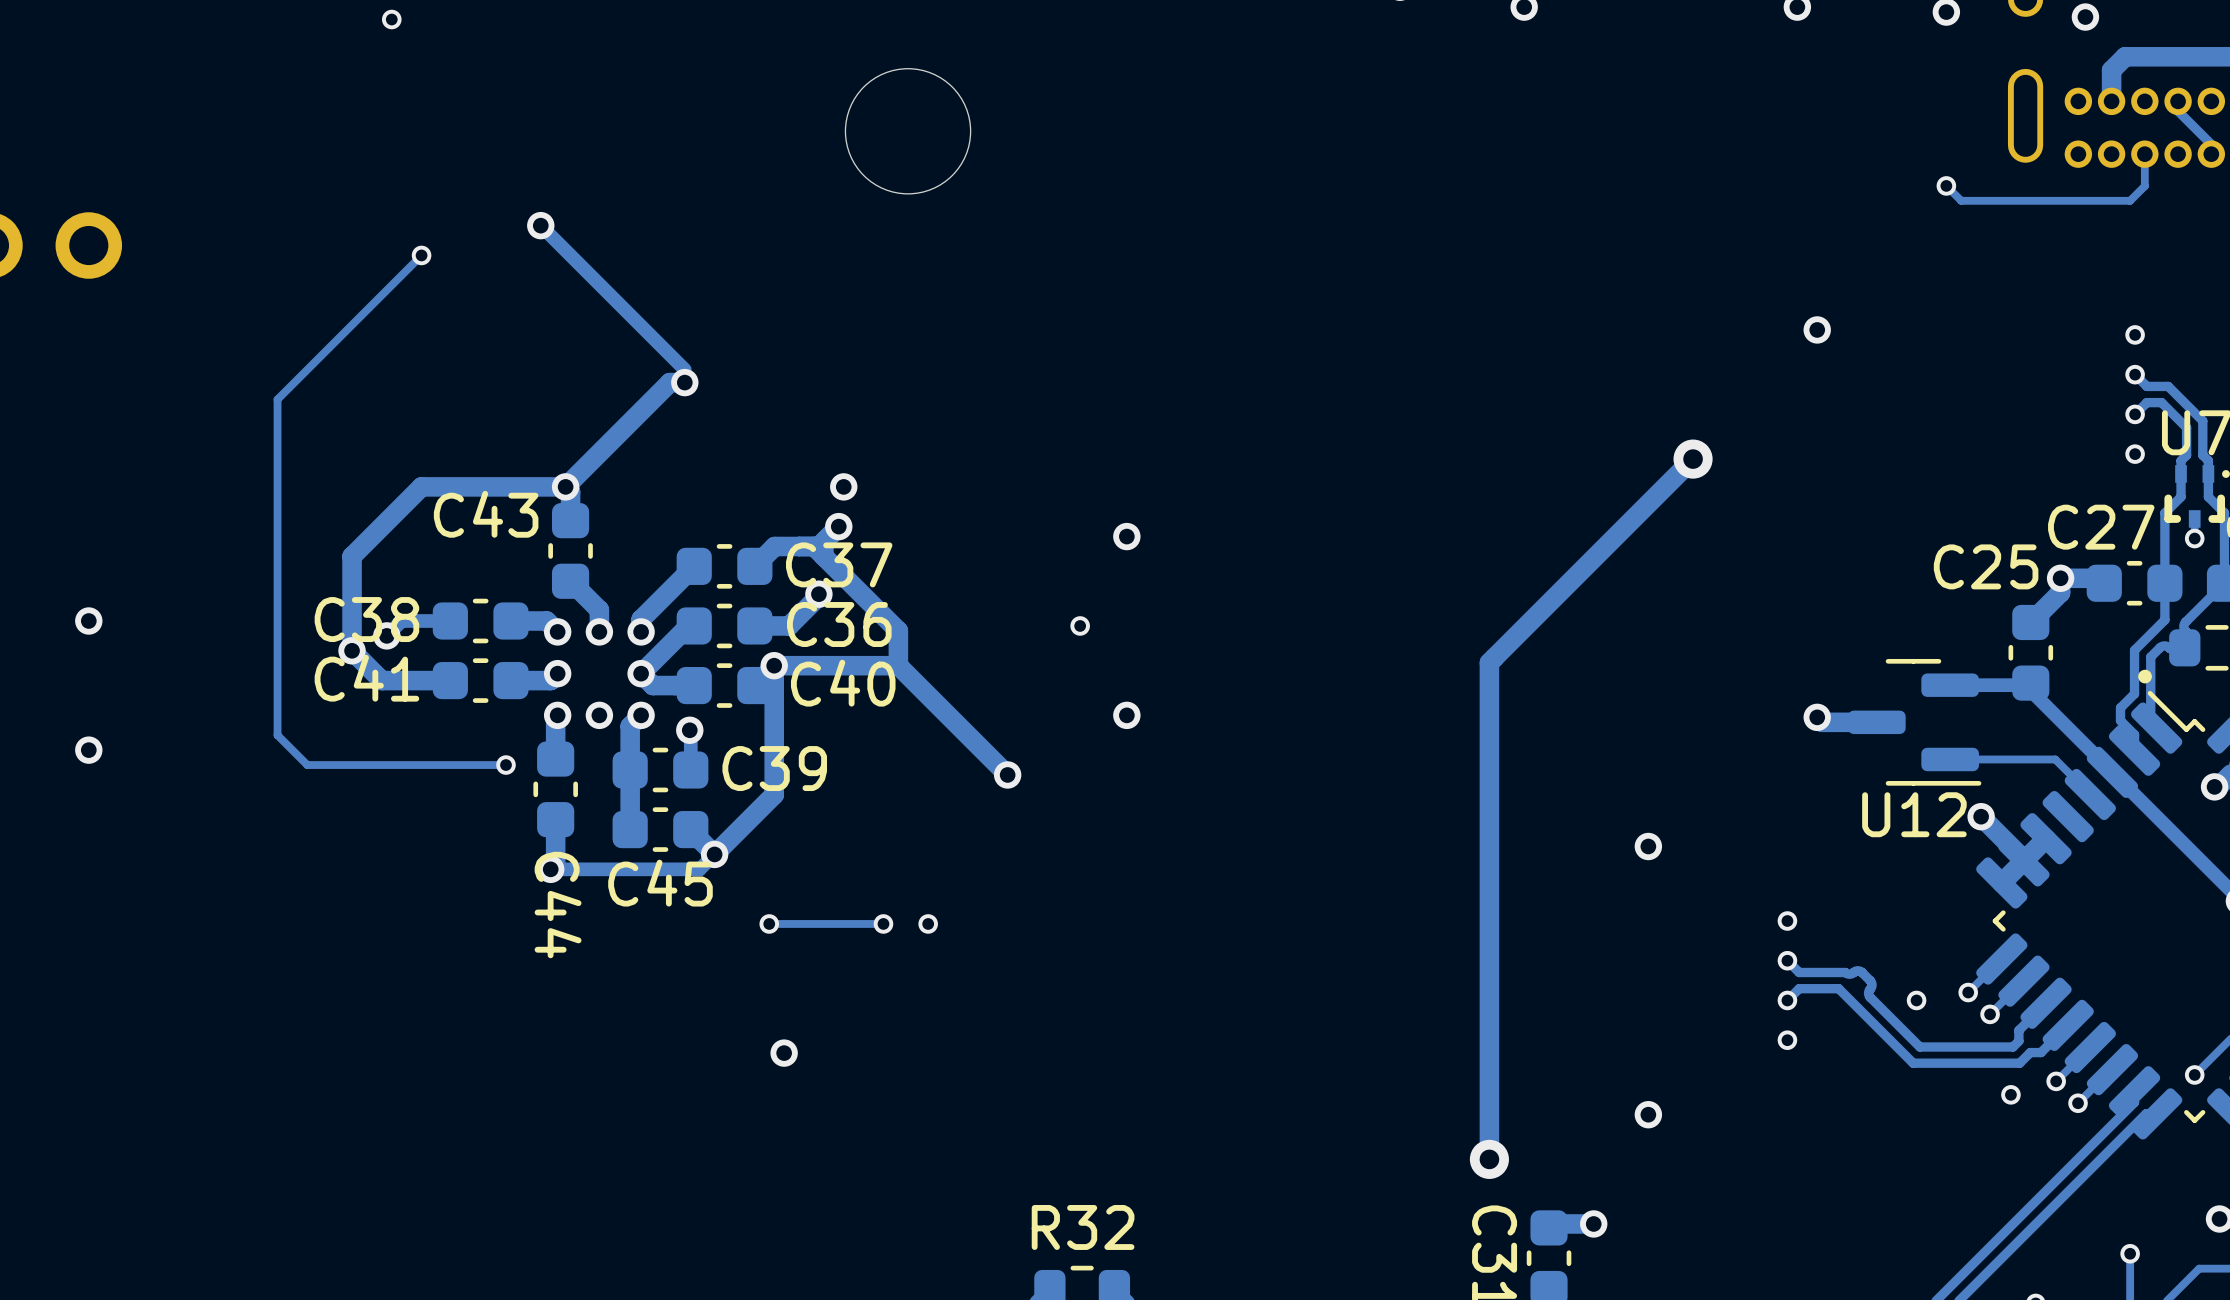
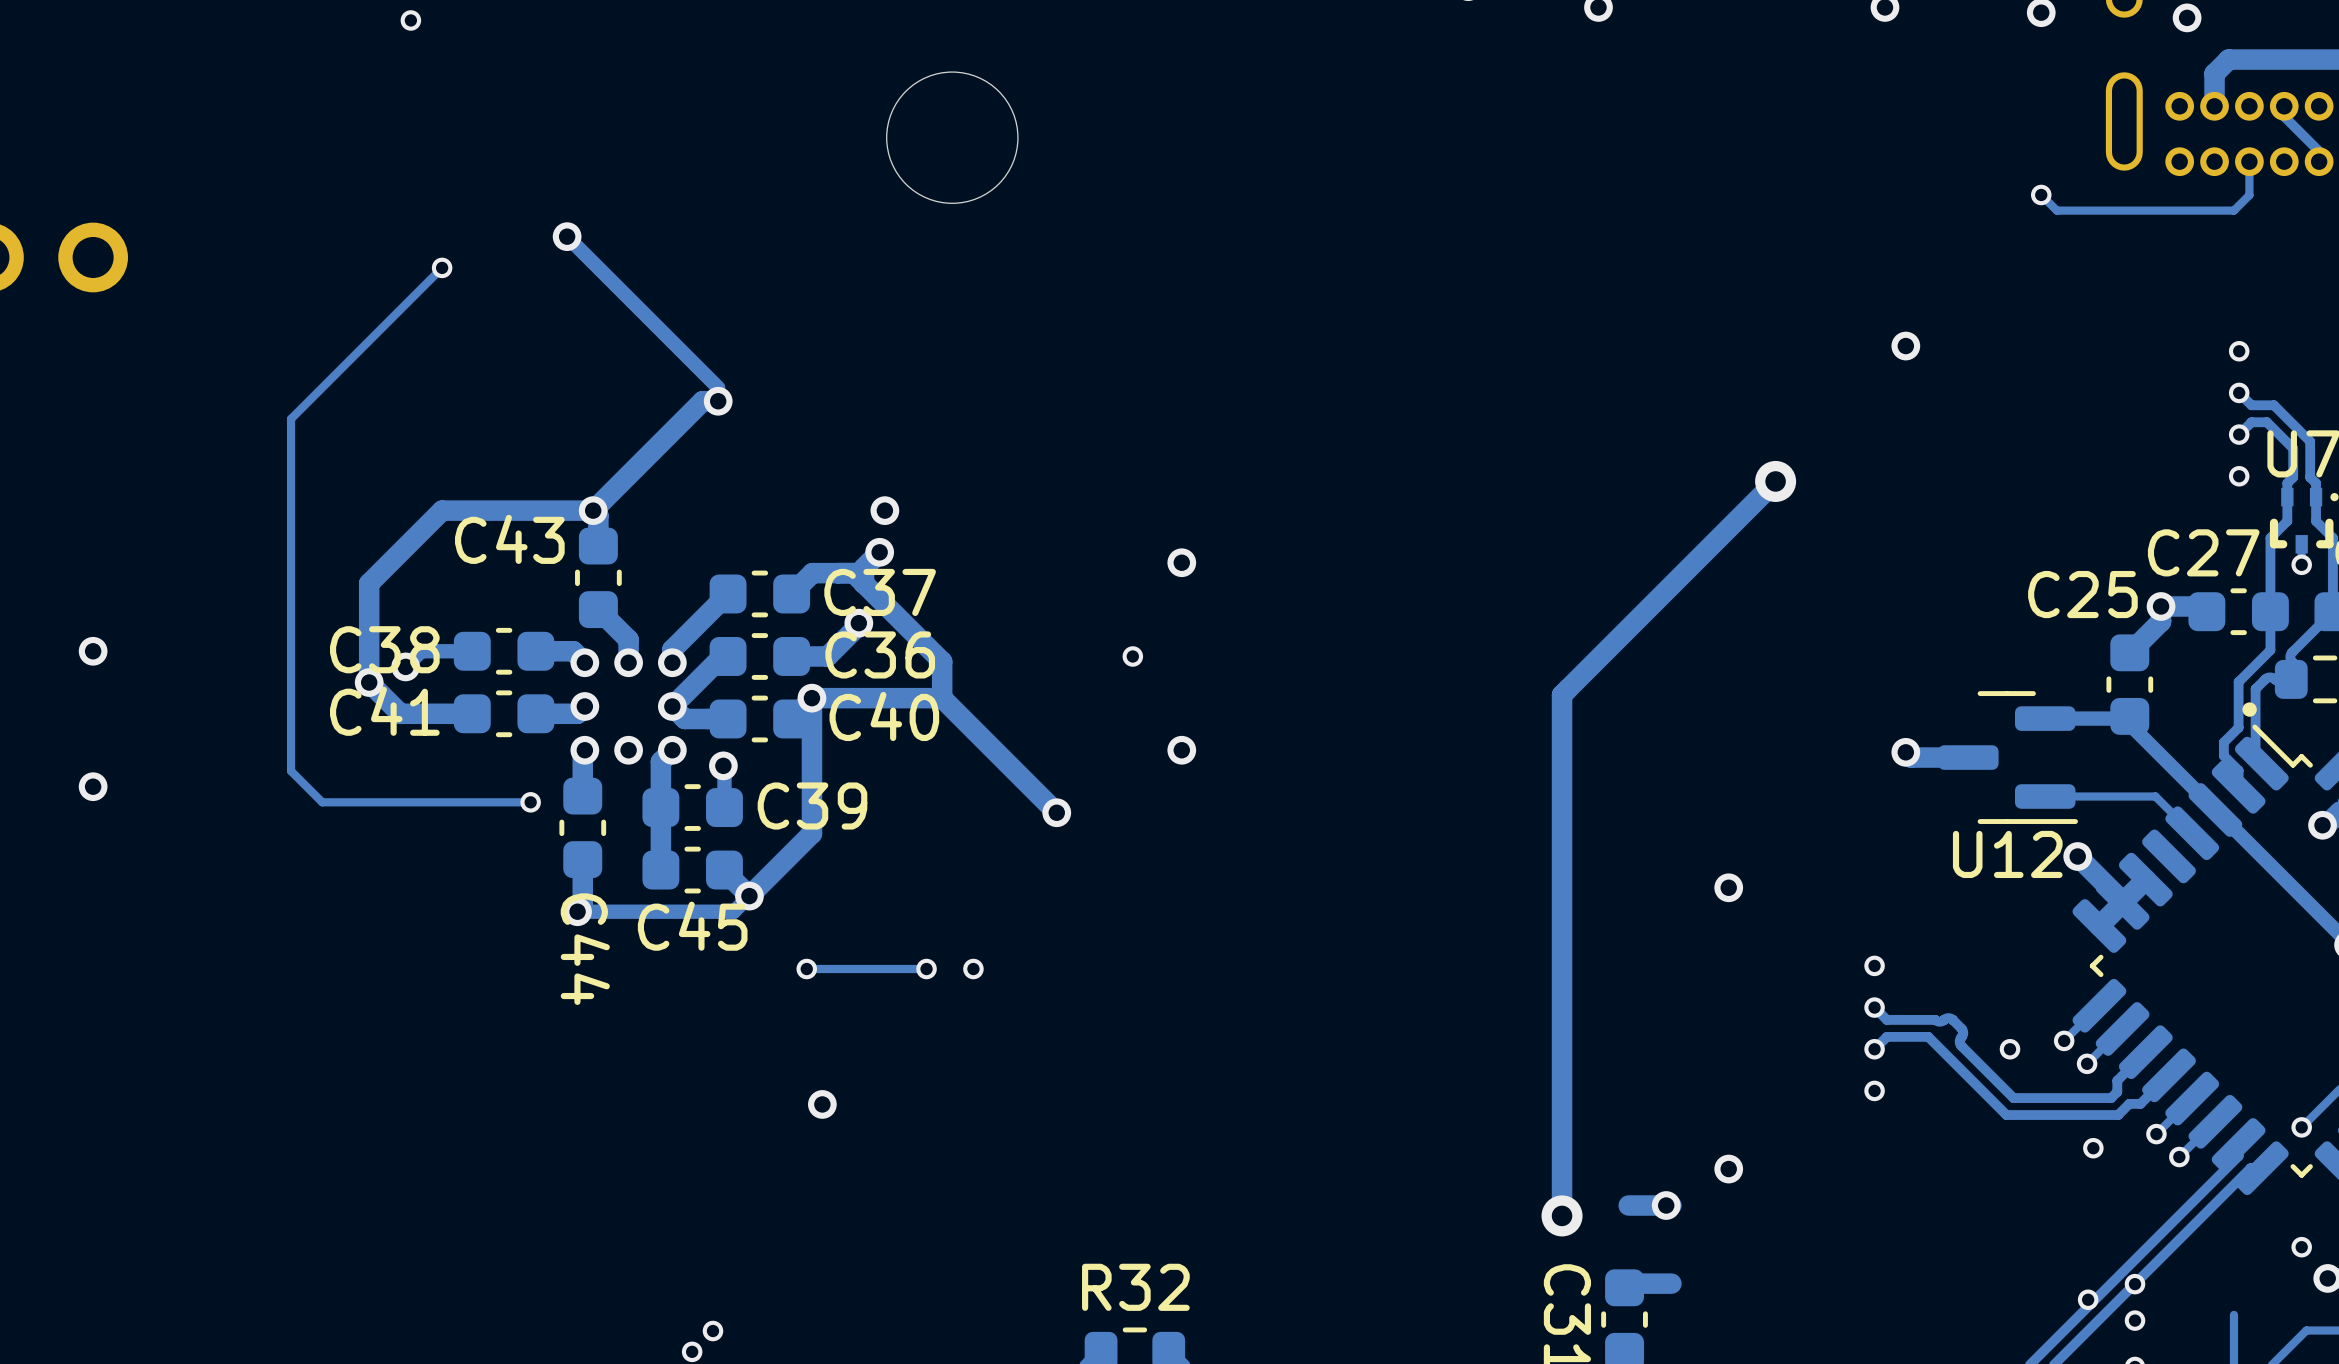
via position: (2010, 1094) -> (2093, 1148)
via: none -> (1666, 1205)
track: none -> (1671, 1205) (1628, 1205)
via: none -> (2301, 1247)
via: (1593, 1223) -> none
via: none -> (2135, 1284)
via: none -> (2088, 1299)
via: (2130, 1253) -> none
via: none -> (2135, 1320)
via: none -> (712, 1331)
via: none -> (692, 1351)

